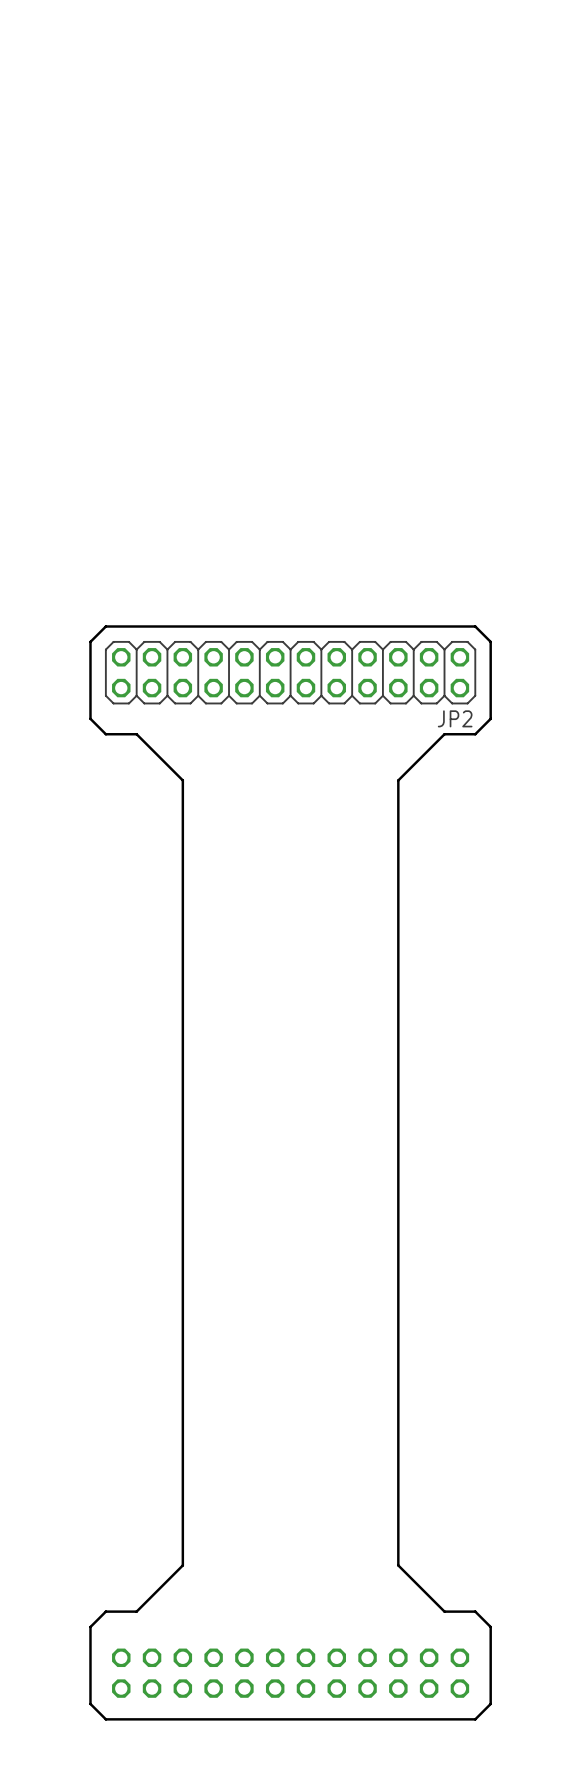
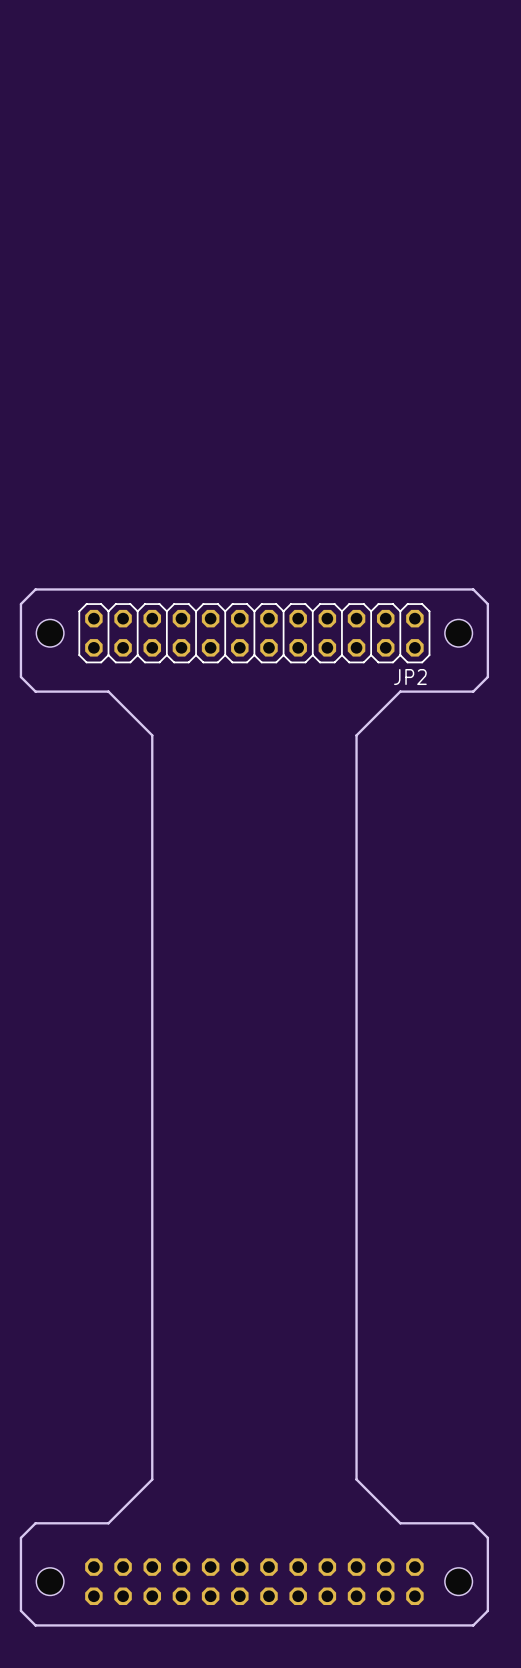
board edge: (105, 626) (90, 641) (90, 718) (105, 734) -> (79, 589) (35, 589) (20, 604) (20, 677) (35, 691) (79, 691)
board edge: (475, 626) (490, 641) (490, 718) (475, 734) -> (429, 589) (473, 589) (487, 604) (487, 677) (473, 691) (429, 691)
hole: none -> (50, 633)
hole: none -> (458, 633)
board edge: (105, 1611) (90, 1627) (90, 1703) (105, 1719) -> (79, 1523) (35, 1523) (20, 1537) (20, 1610) (35, 1625) (79, 1625)
board edge: (475, 1611) (490, 1627) (490, 1703) (475, 1719) -> (429, 1523) (473, 1523) (487, 1537) (487, 1610) (473, 1625) (429, 1625)
hole: none -> (50, 1581)
hole: none -> (458, 1581)

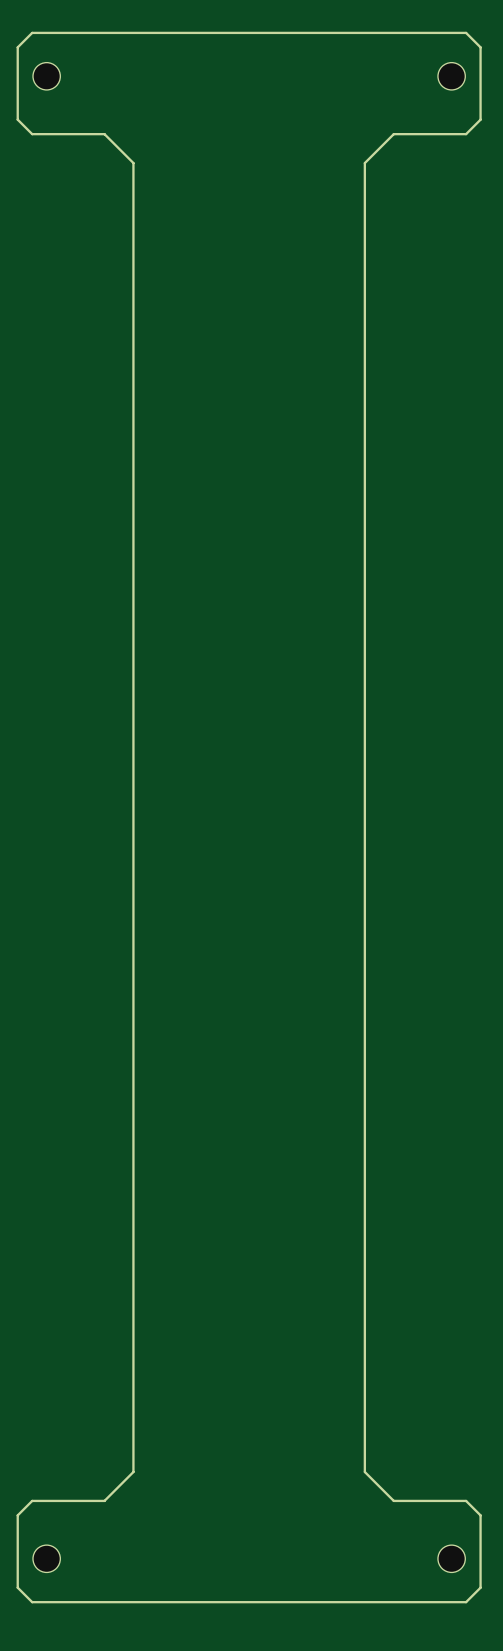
hole: none -> (46, 76)
hole: none -> (451, 76)
hole: (50, 633) -> none
JP2: (254, 633) -> none
hole: (458, 633) -> none
board edge: (371, 1494) (356, 1479) (356, 735) (400, 691) (473, 691) (487, 677) (487, 604) (473, 589) (35, 589) (20, 604) (20, 677) (35, 691) (108, 691) (152, 735) (152, 1479) (137, 1494) -> (364, 1472) (364, 163) (393, 134) (466, 134) (480, 119) (480, 47) (466, 32) (32, 32) (17, 47) (17, 119) (32, 134) (104, 134) (133, 163) (133, 1472)
part: (254, 1581) -> none

